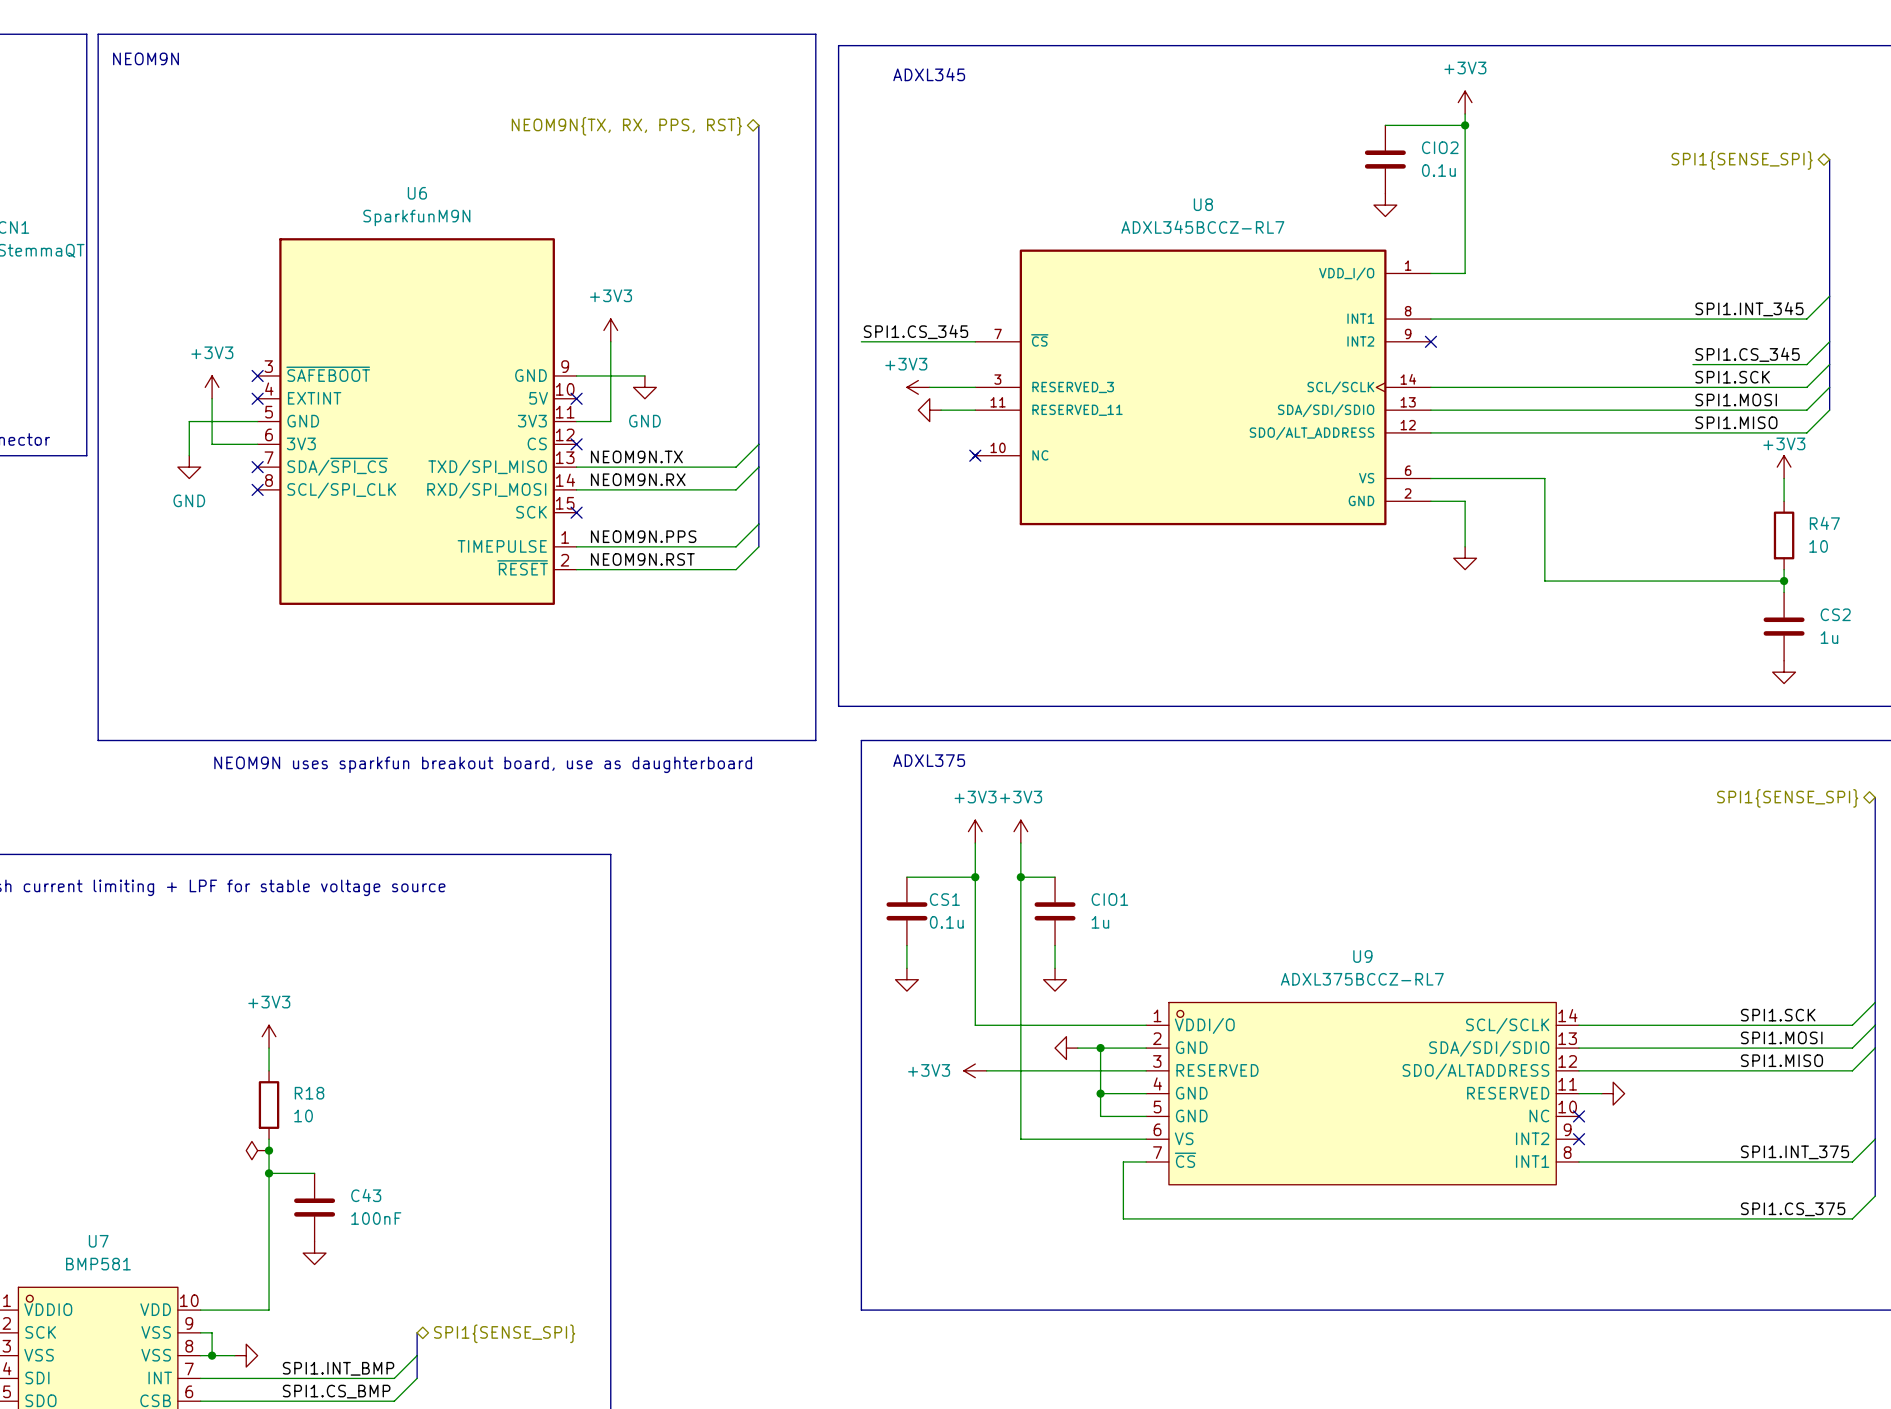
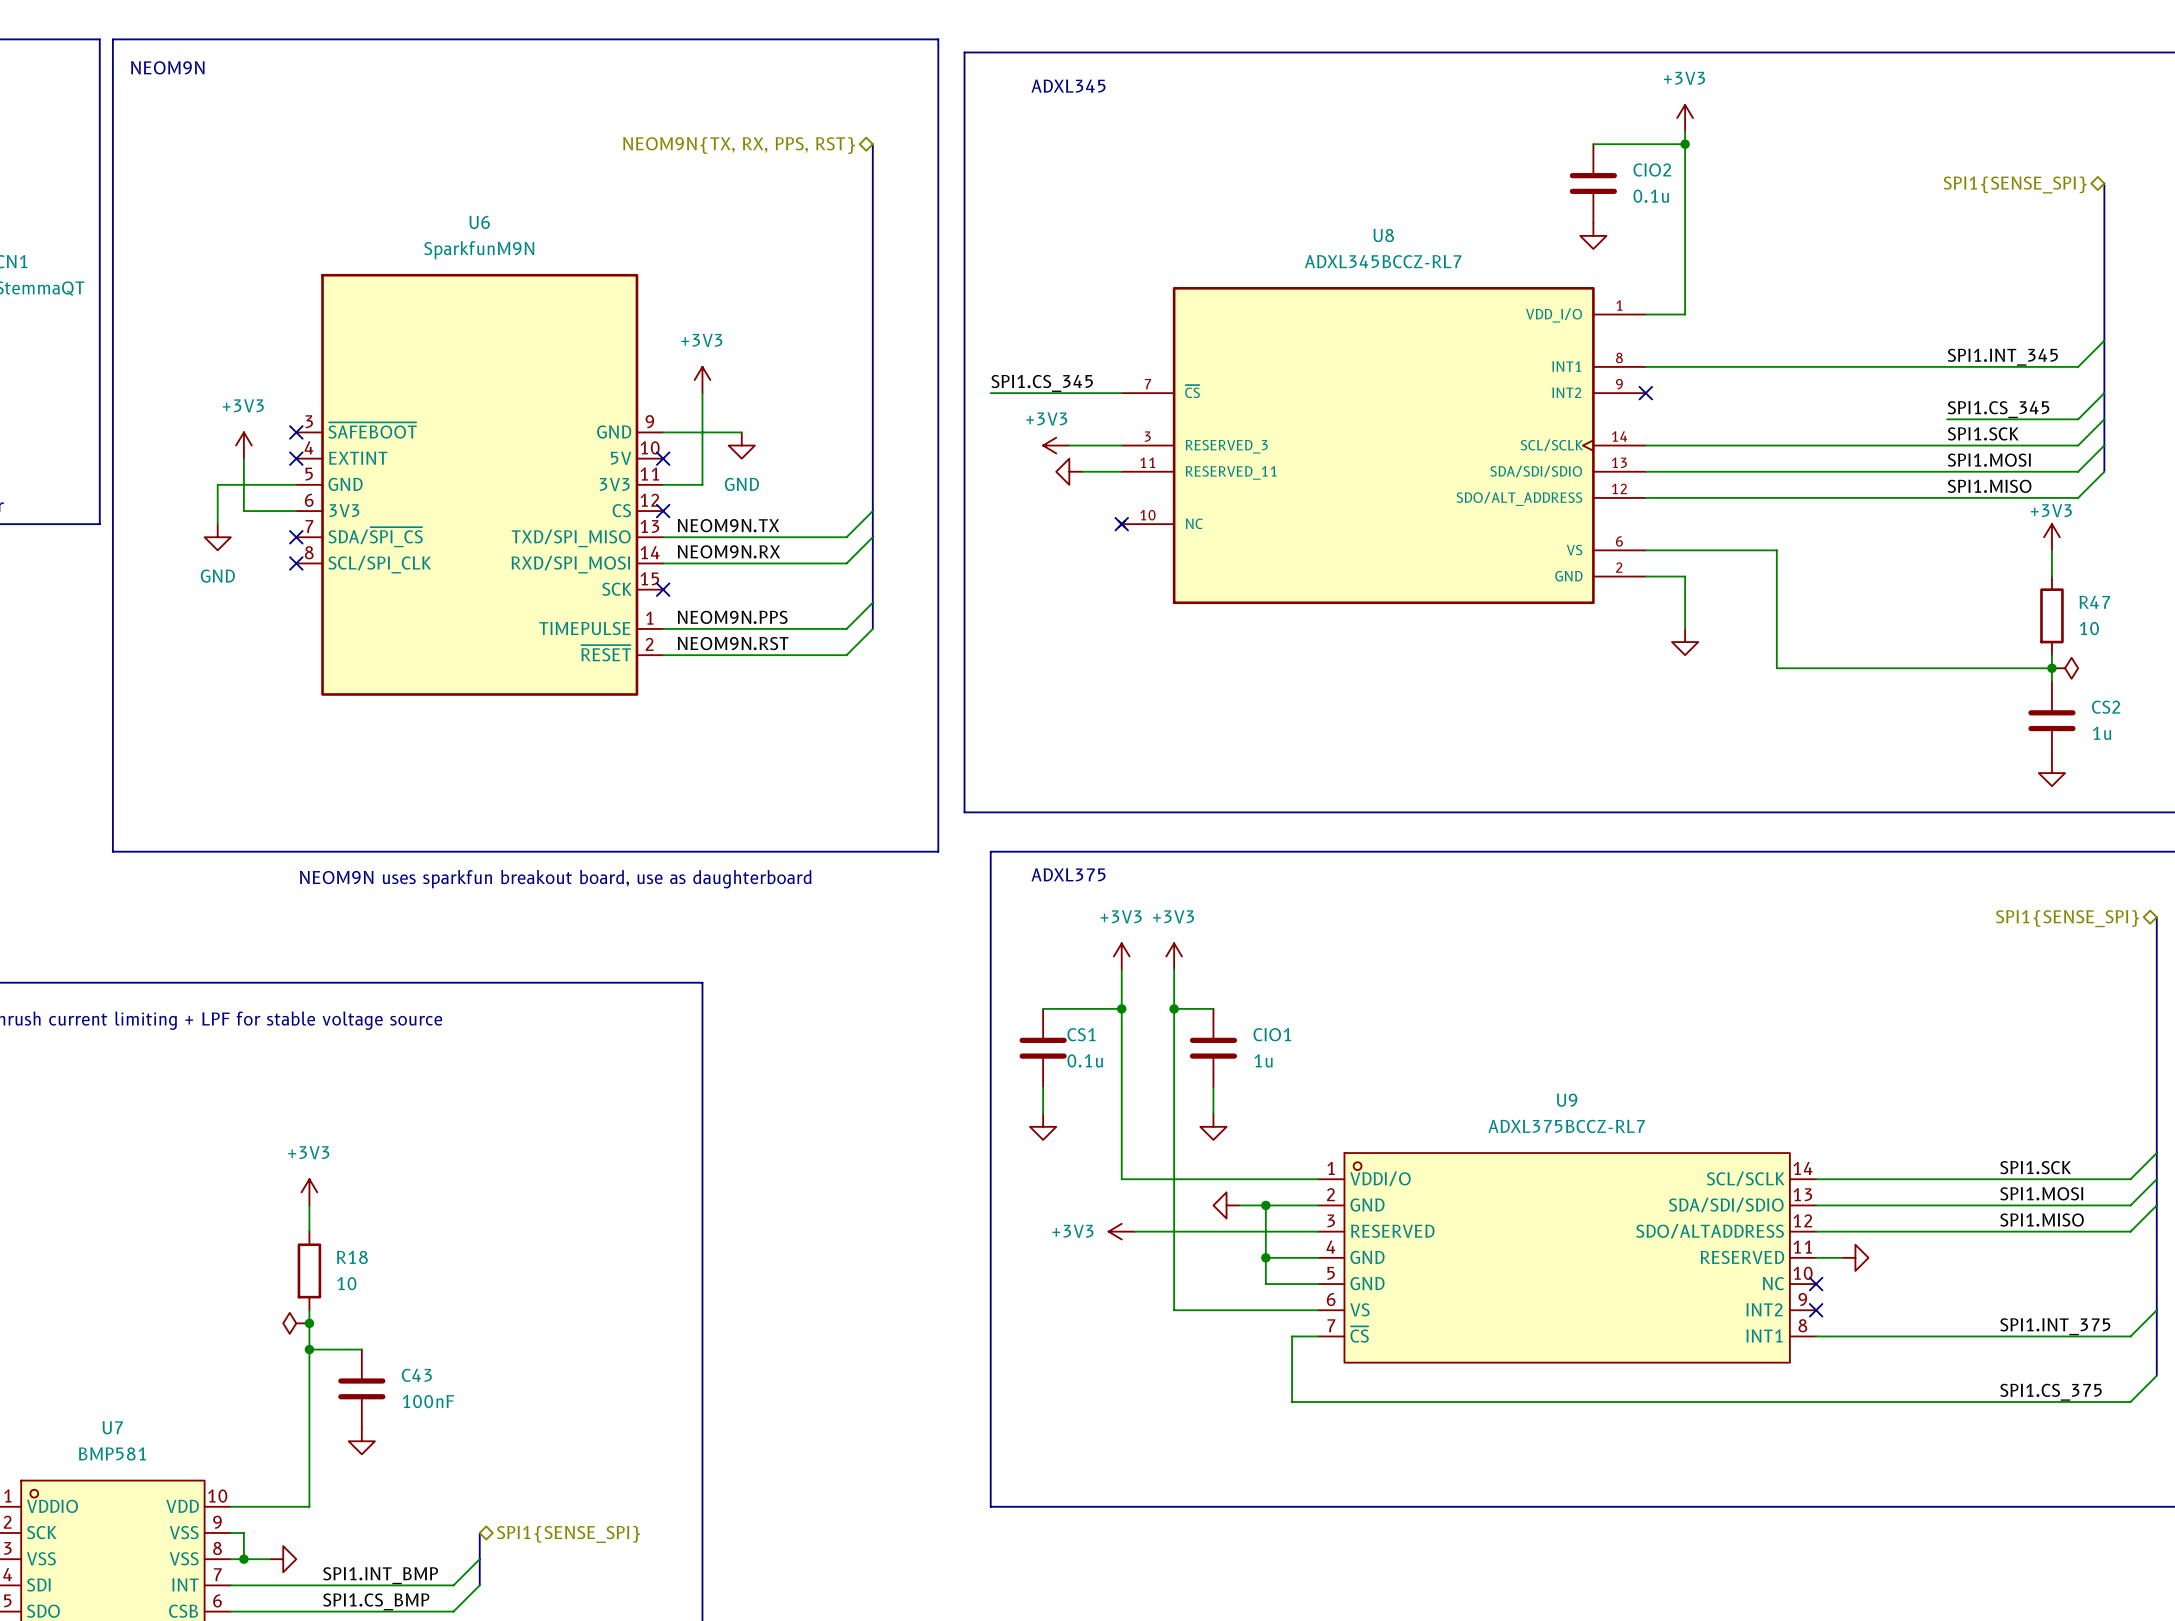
power symbol: none -> (2065, 668)

